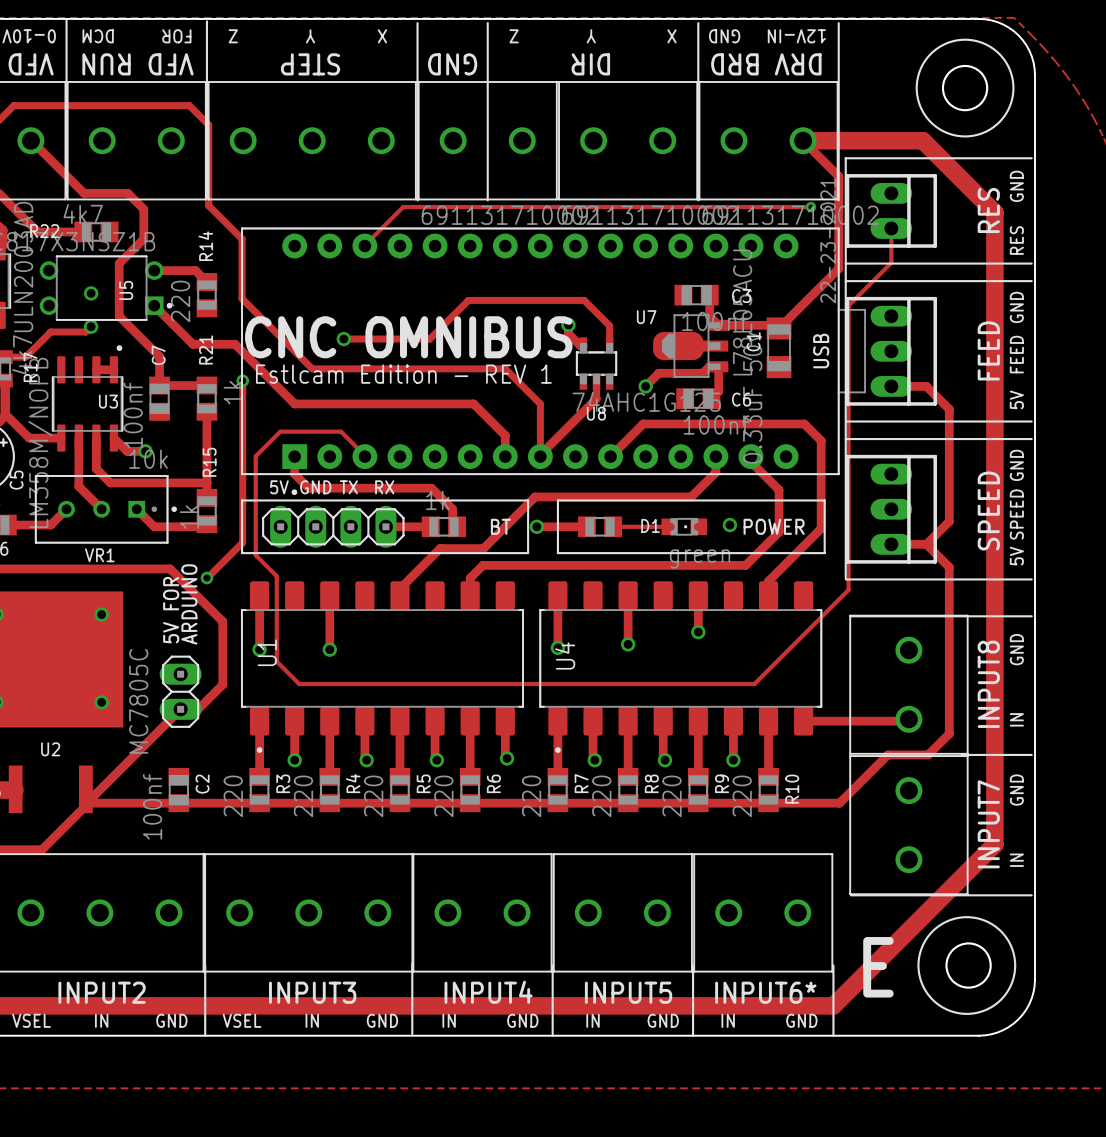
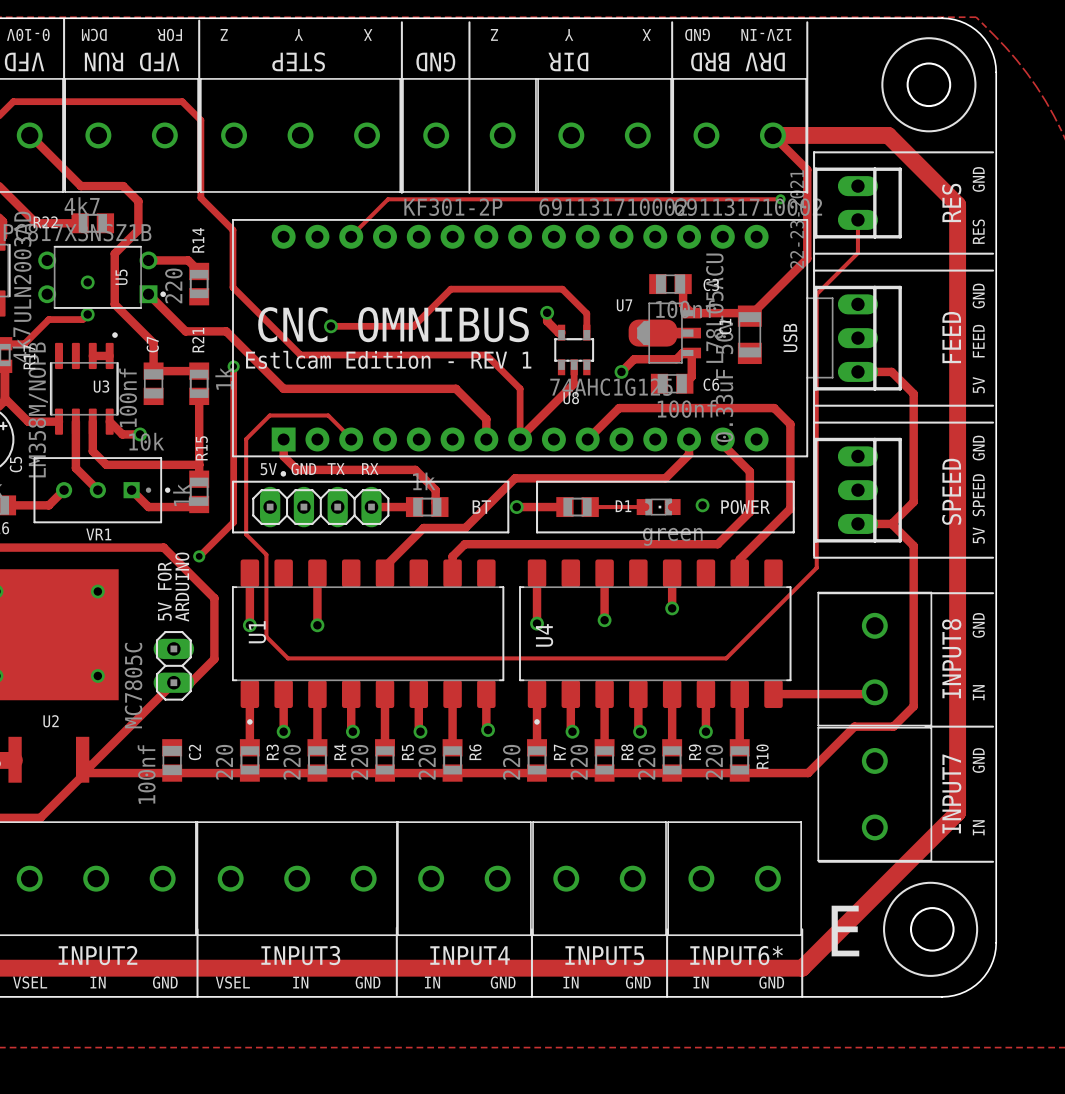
part value: 691131710002 (509, 215) -> KF301-2P (453, 207)

